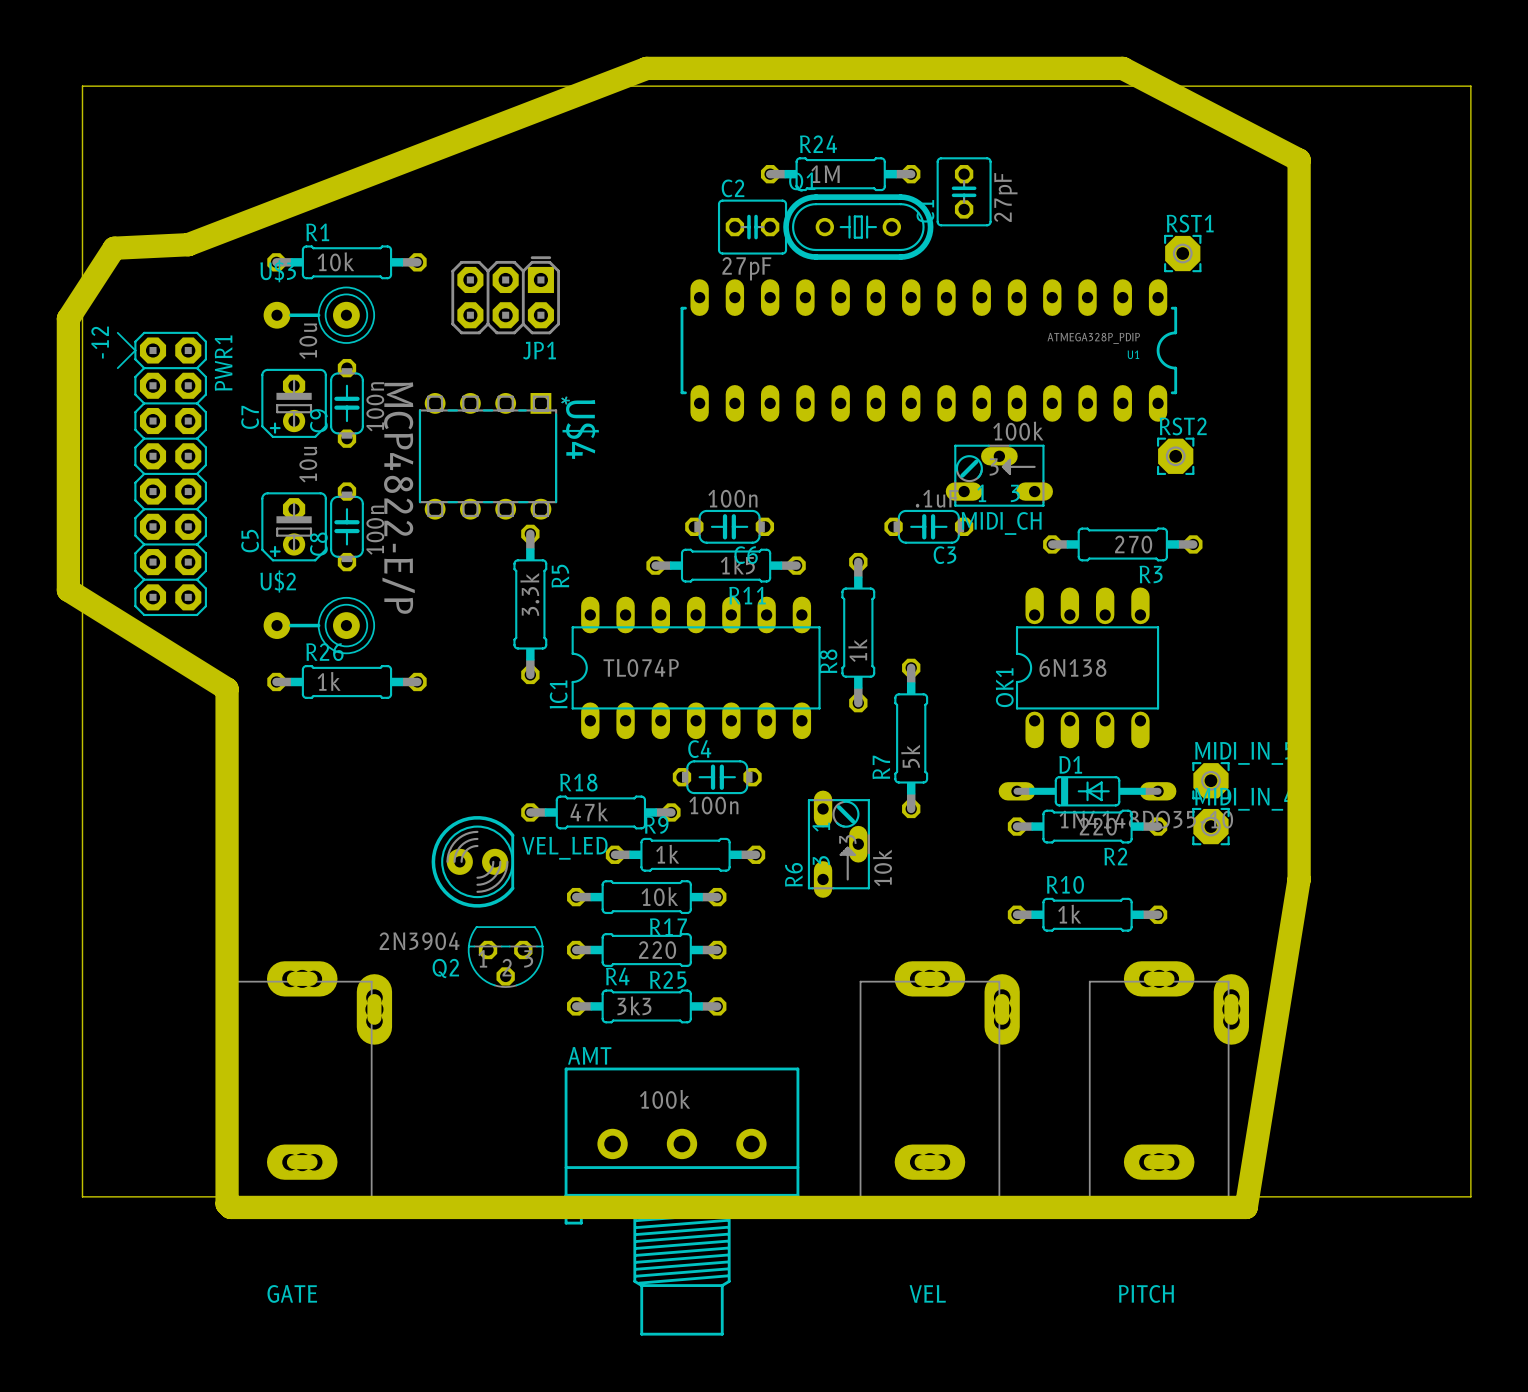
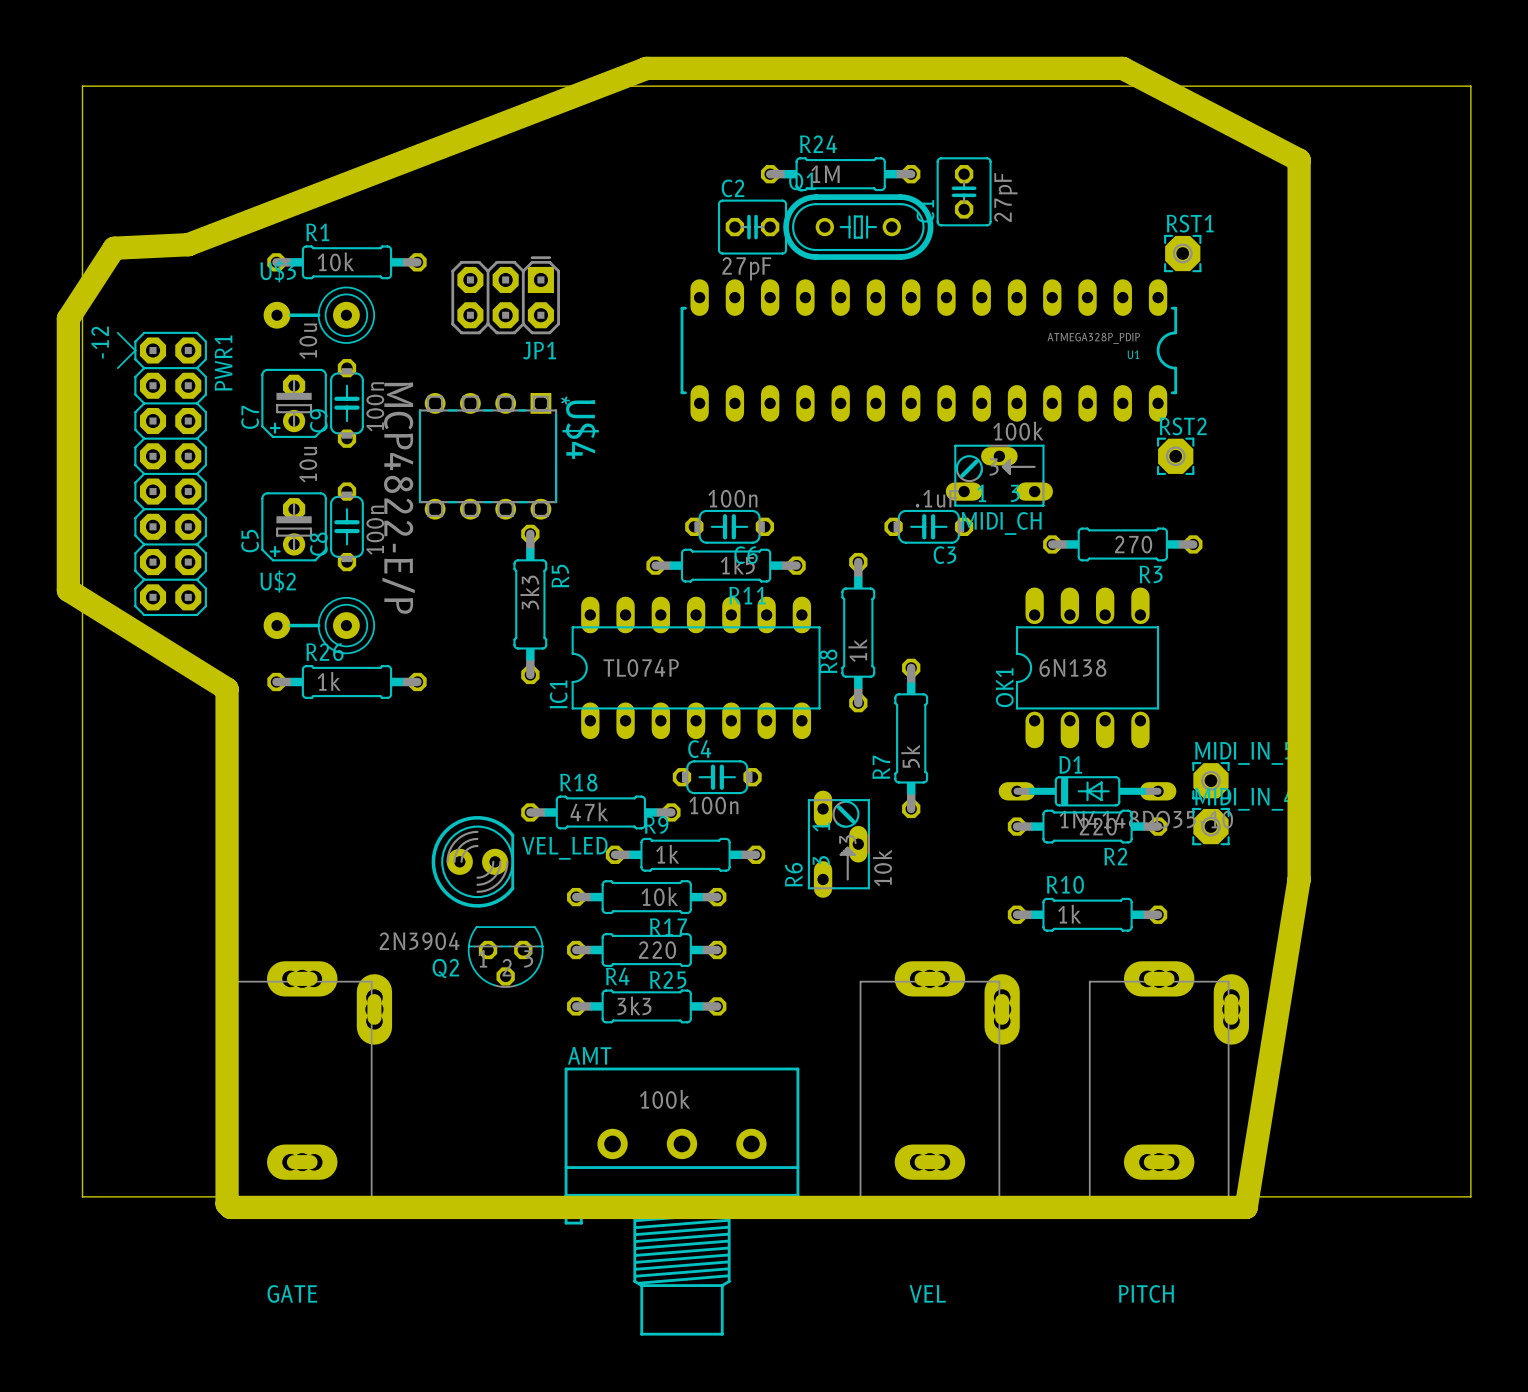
R5 value: 3.3k (529, 594) -> 3k3 (529, 592)

